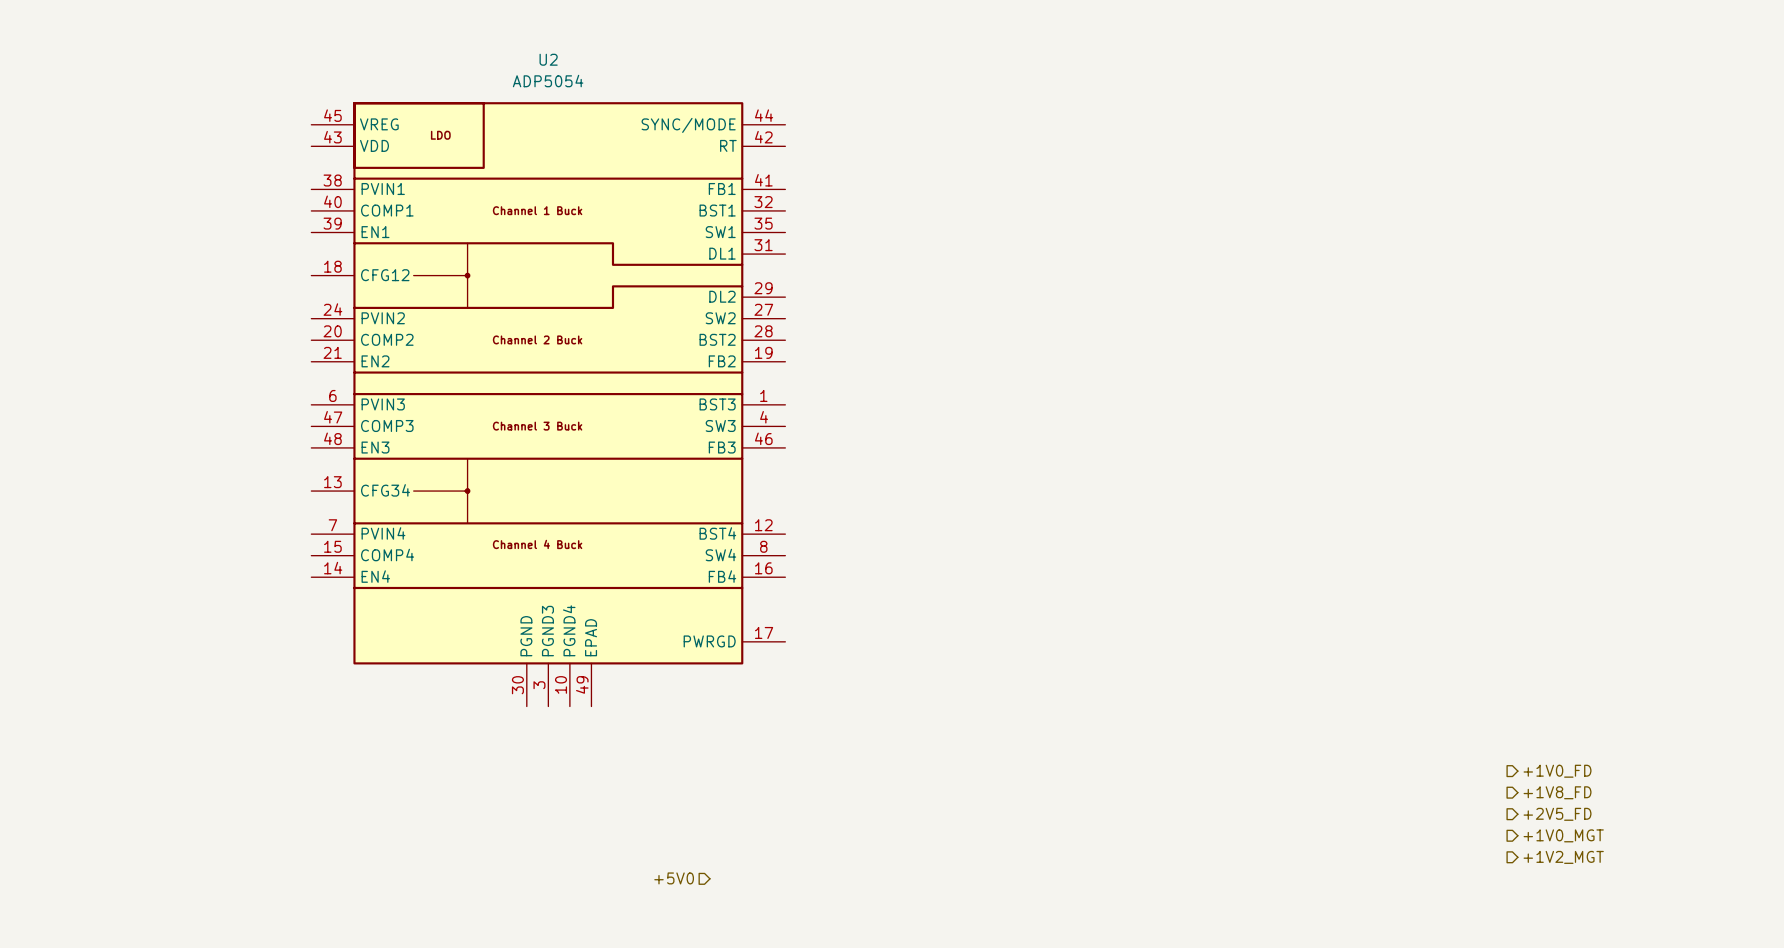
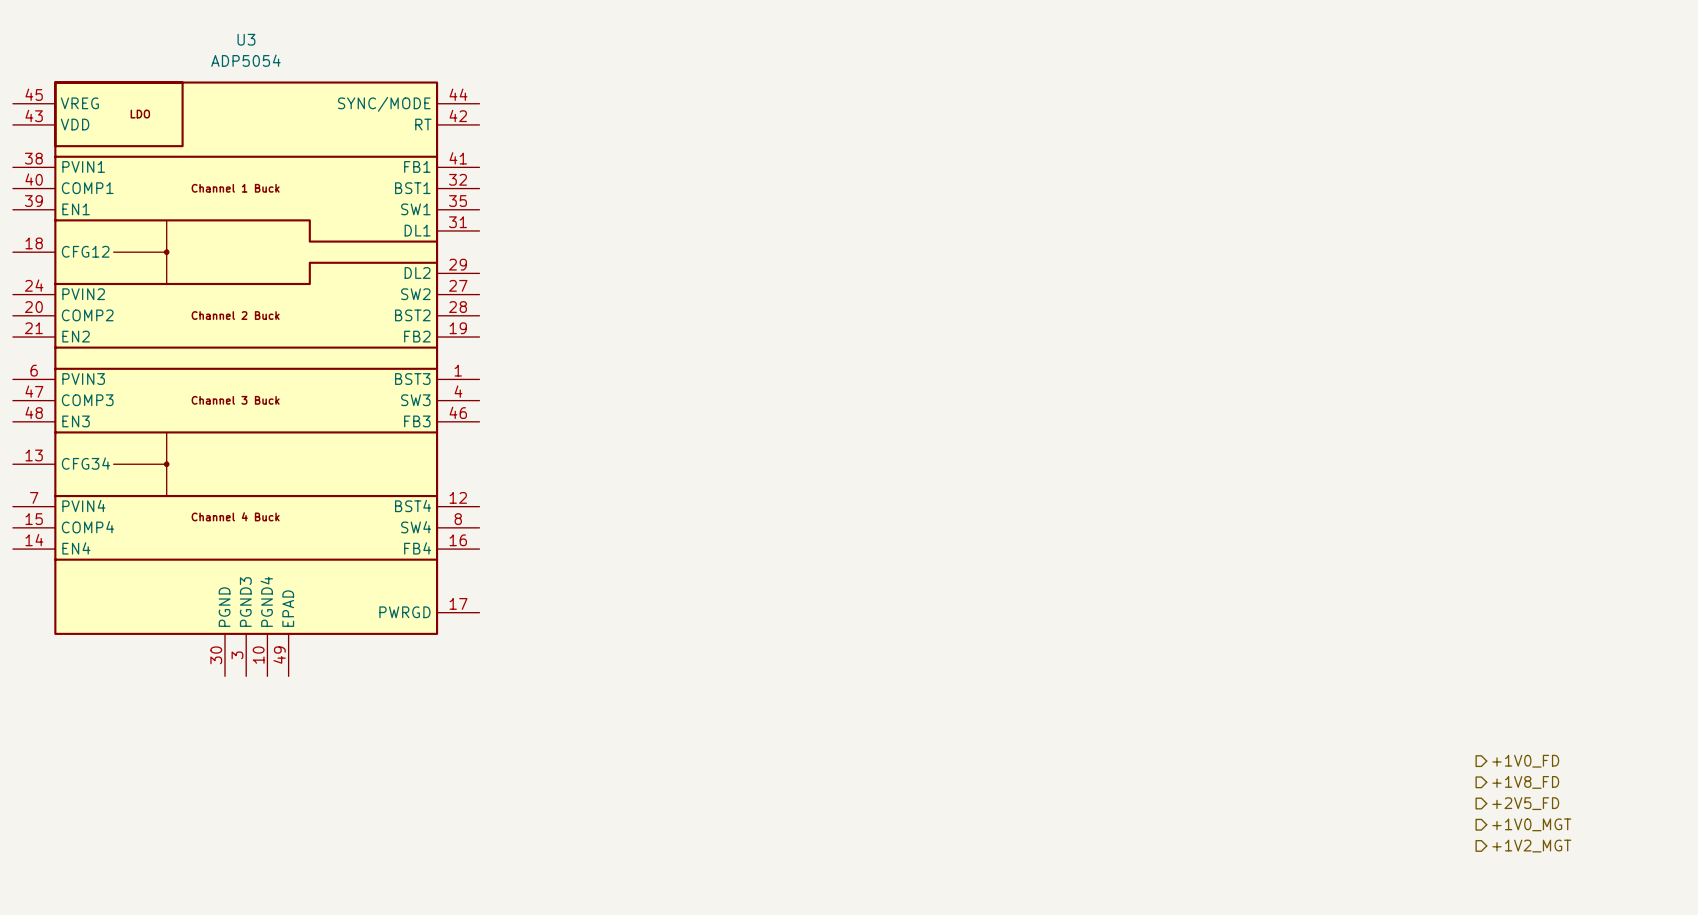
U3: none -> ADP5054 (246, 378)
U2: ADP5054 (548, 404) -> none
hierarchical label: +5V0 (674, 878) -> none

